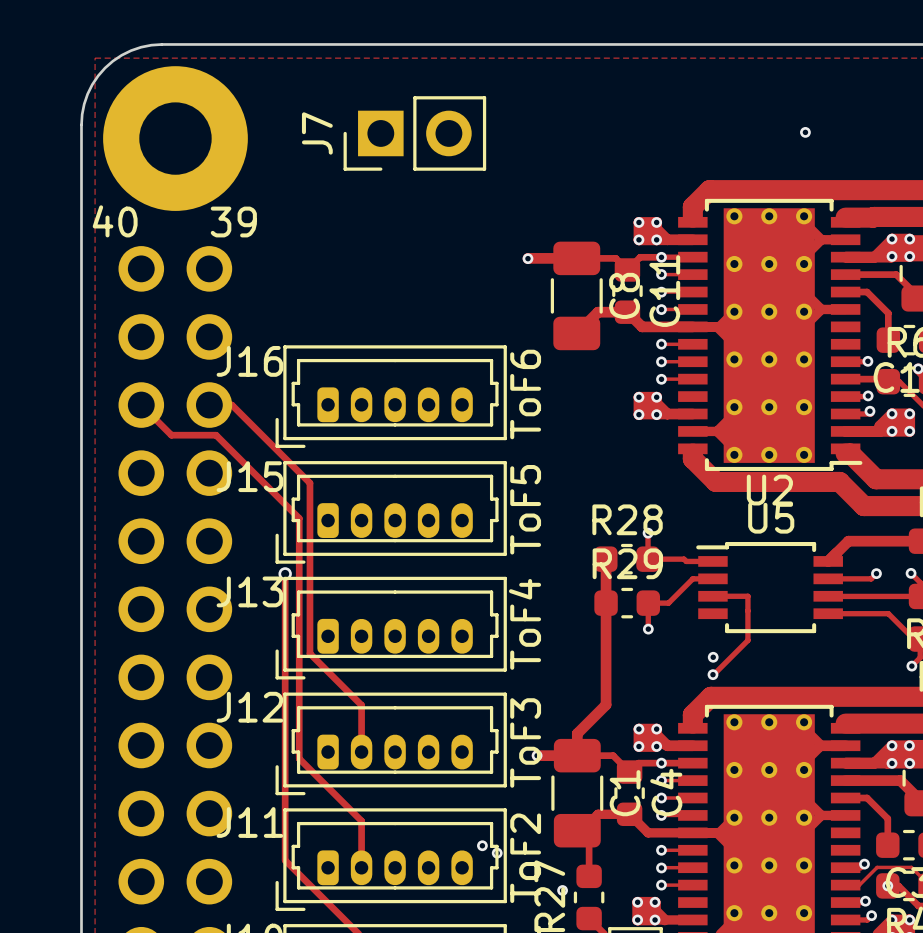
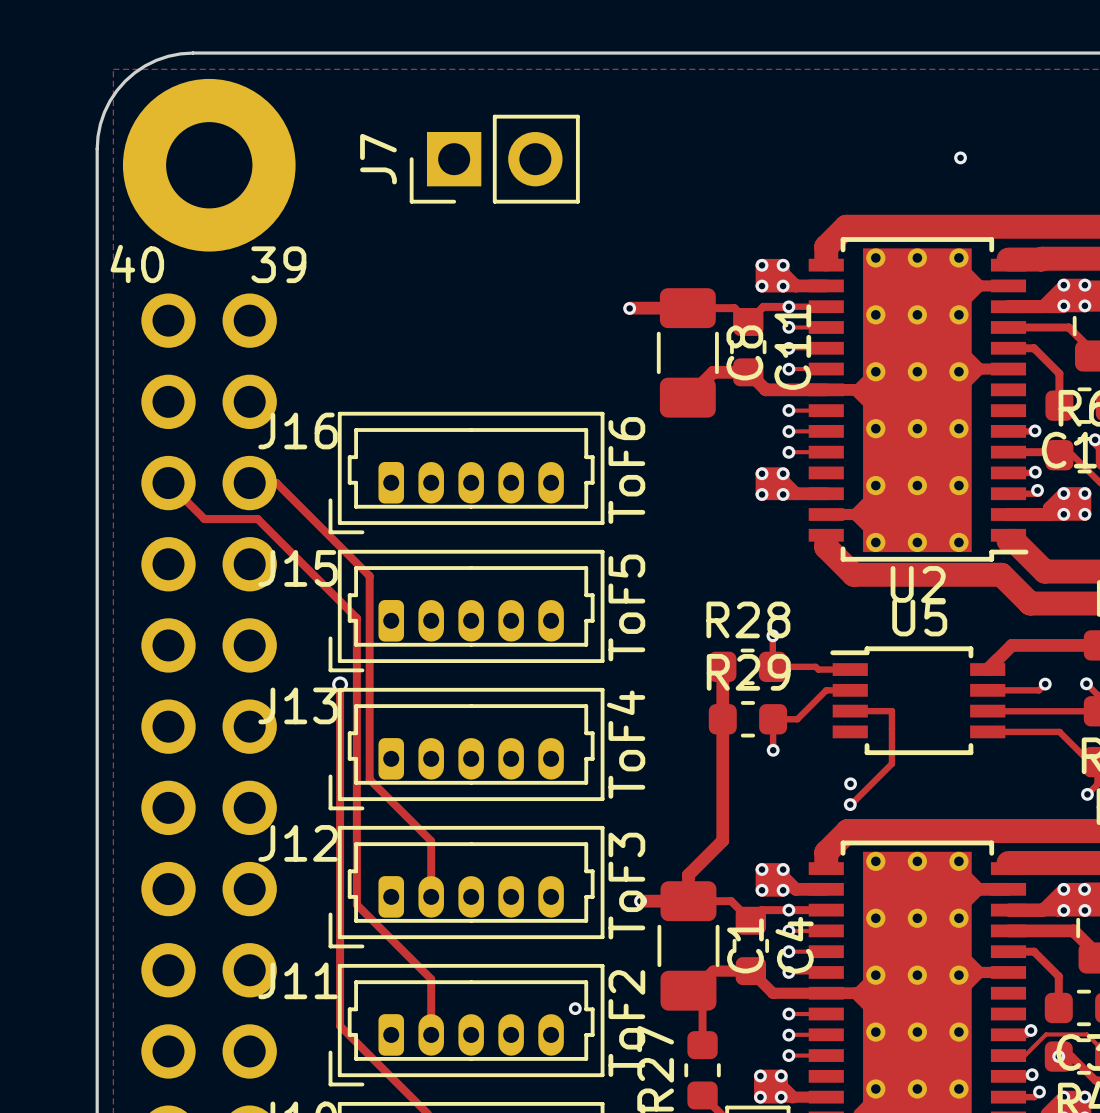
via: (497, 853) -> none
via: (562, 890) -> none

